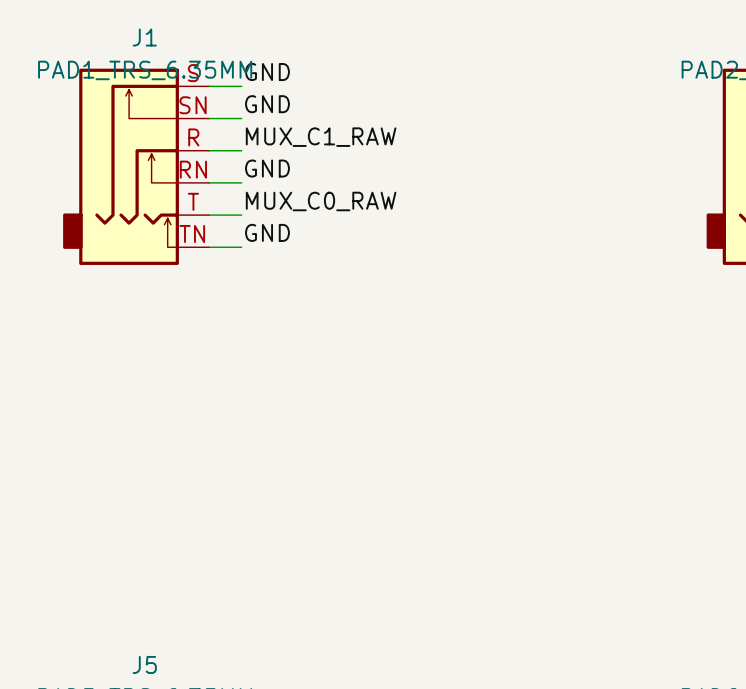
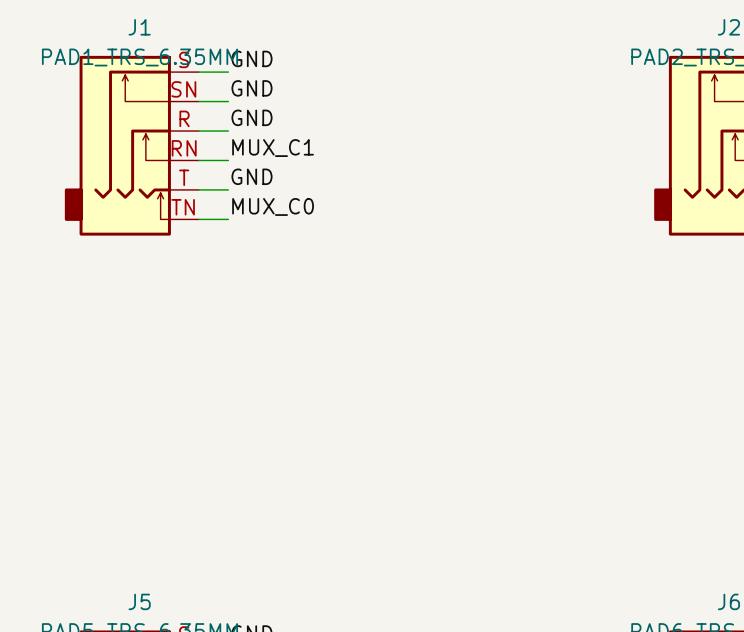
label: MUX_C1_RAW (321, 137) -> GND (252, 117)
label: GND (267, 168) -> MUX_C1 (273, 148)
label: MUX_C0_RAW (321, 201) -> GND (252, 176)
label: GND (267, 232) -> MUX_C0 (273, 206)

